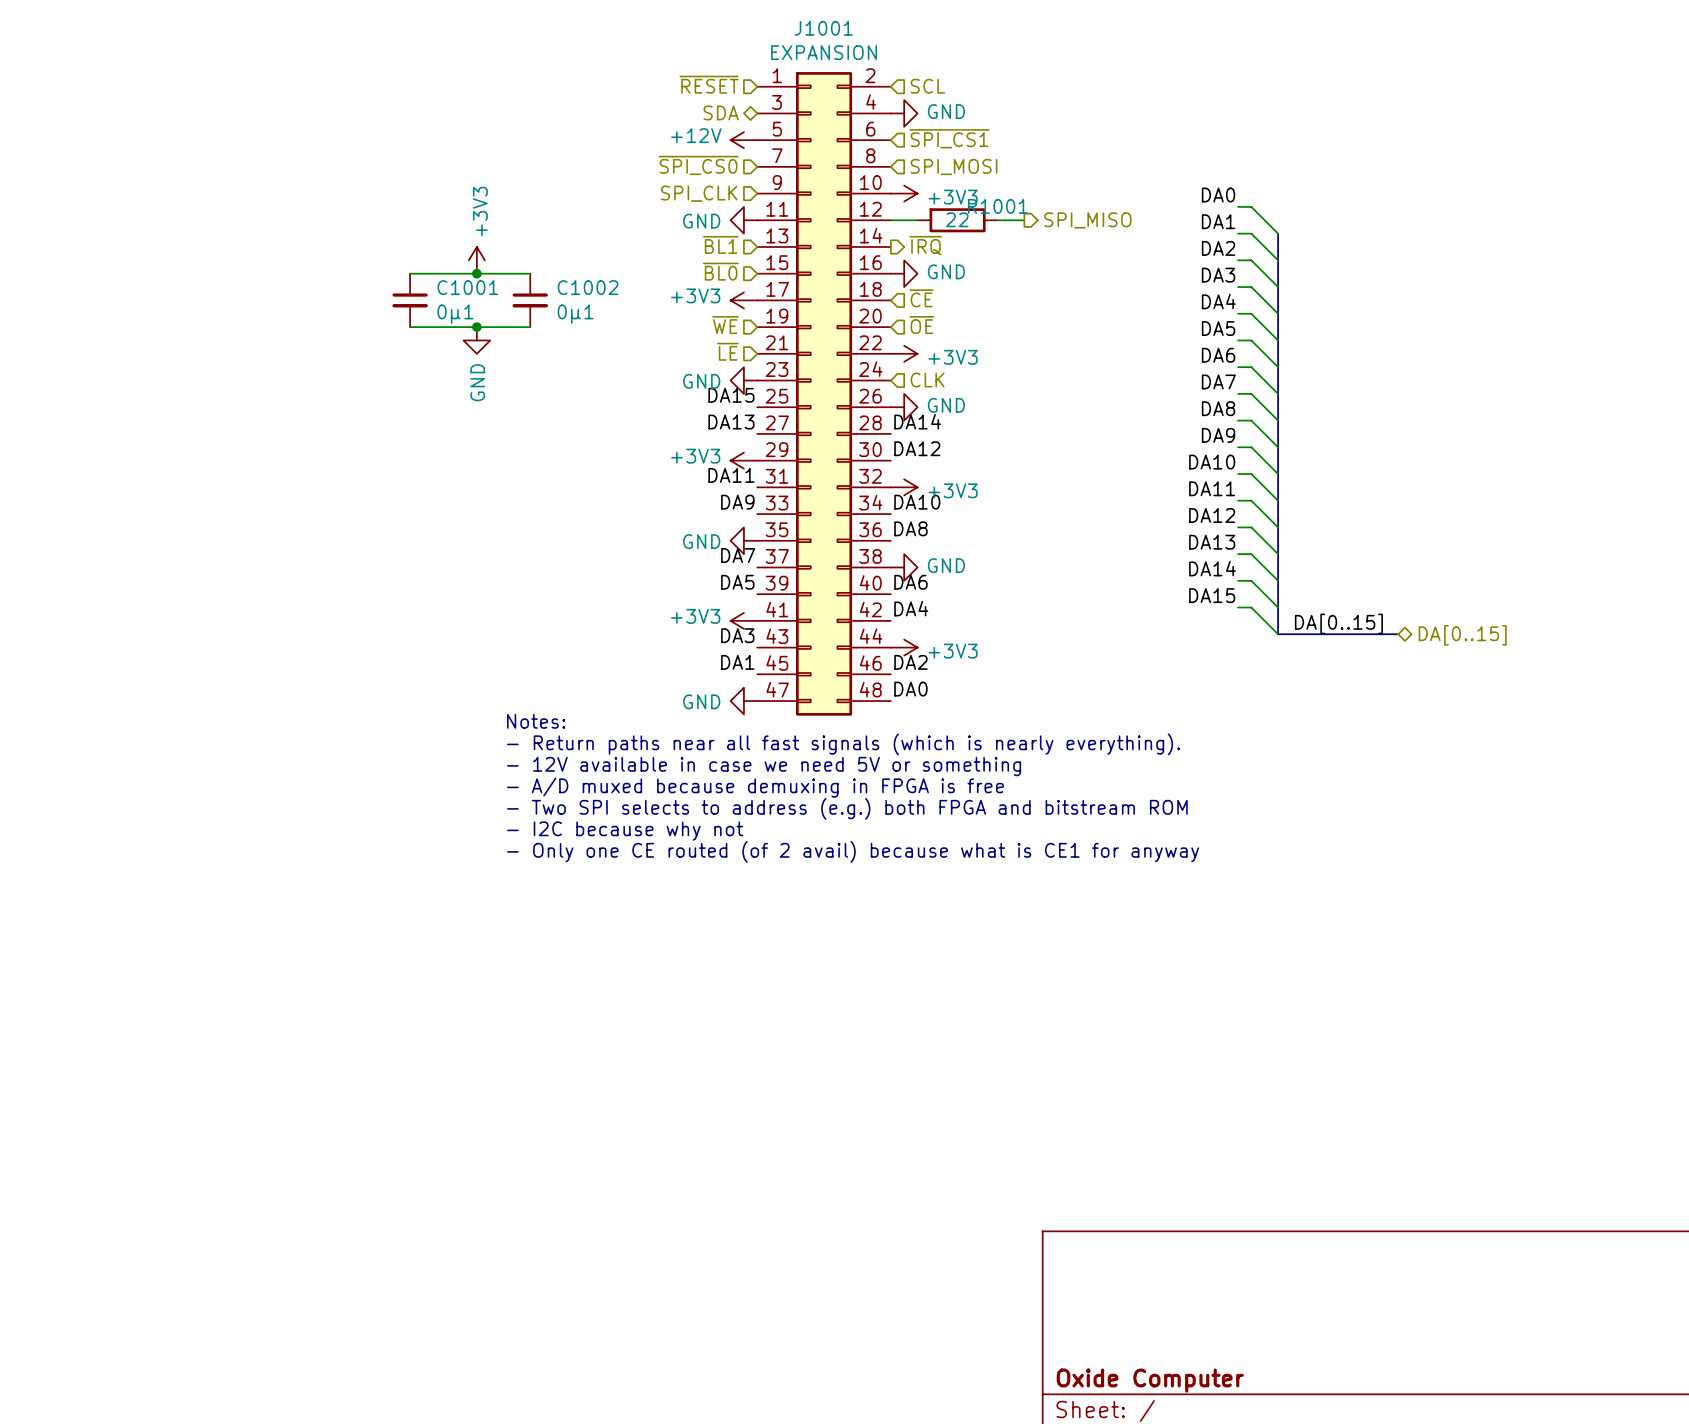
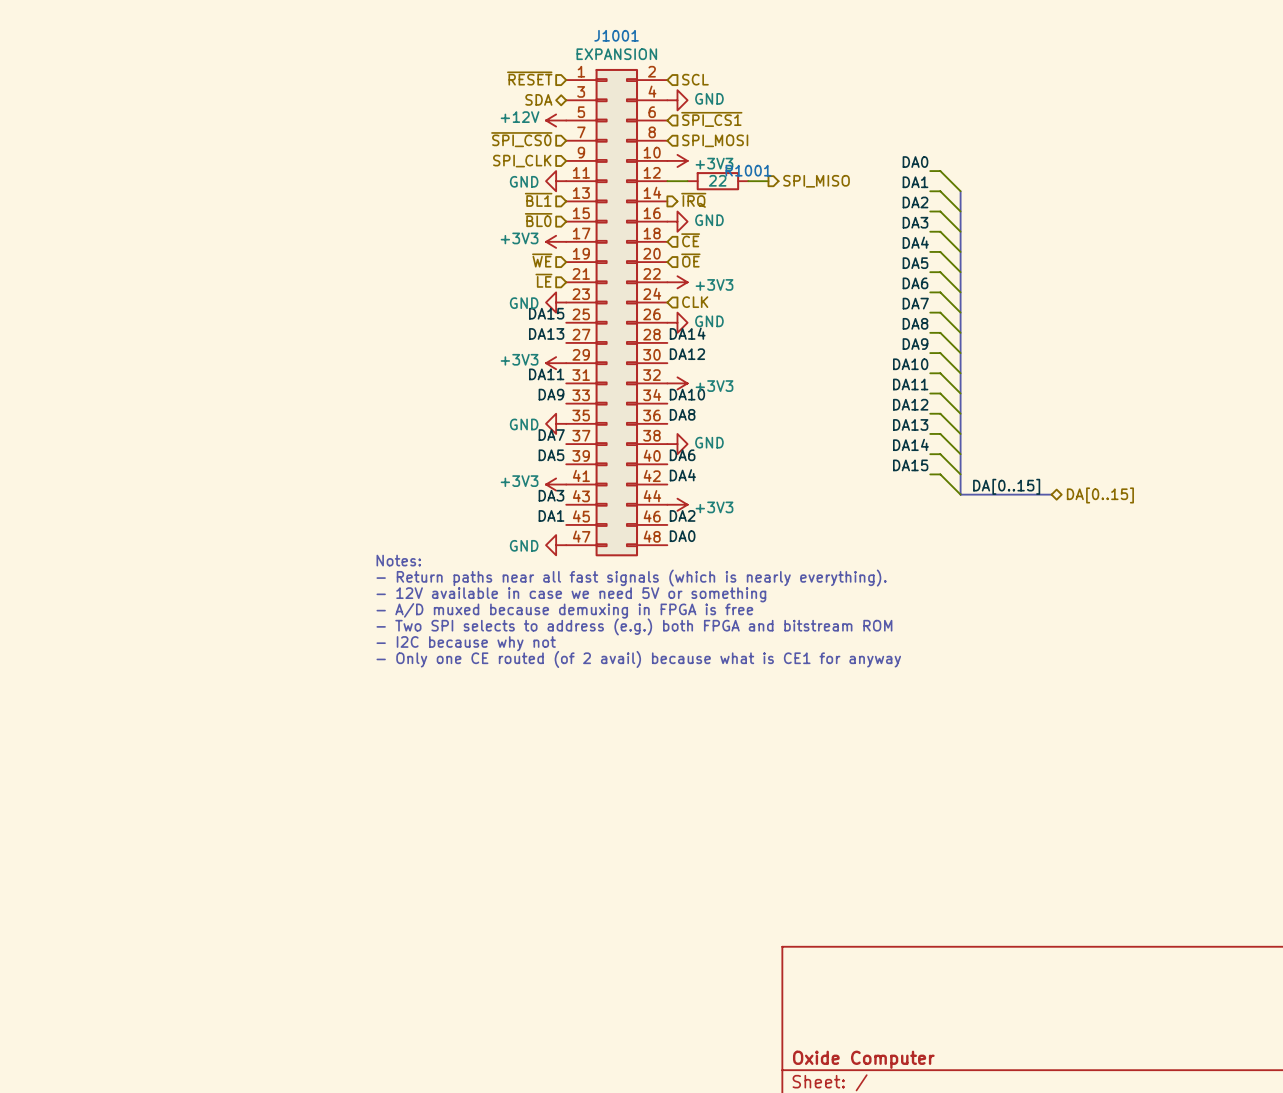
power symbol: +3V3 (476, 260) -> none
wire: (410, 273) (530, 273) -> none
junction: (476, 273) -> none
C1001: 0µ1 (410, 300) -> none
C1002: 0µ1 (530, 300) -> none
wire: (410, 327) (530, 327) -> none
junction: (476, 327) -> none
power symbol: GND (476, 340) -> none

